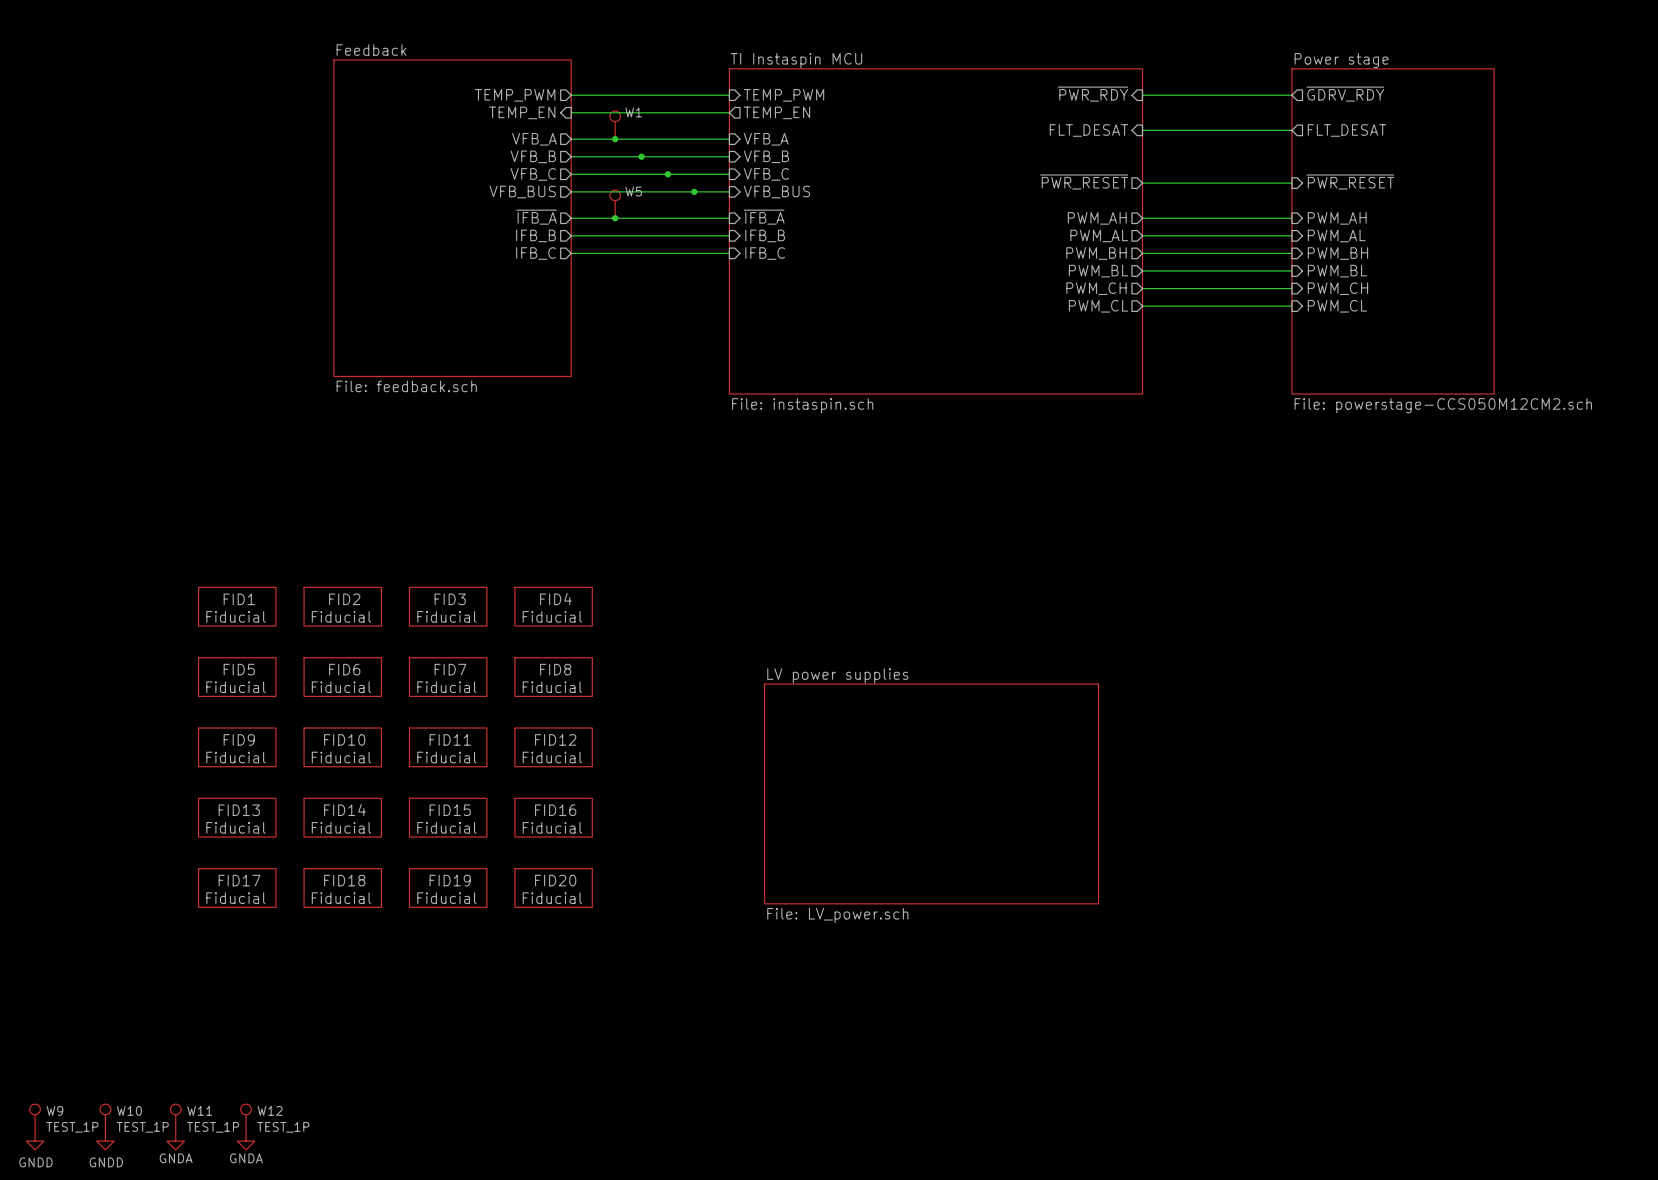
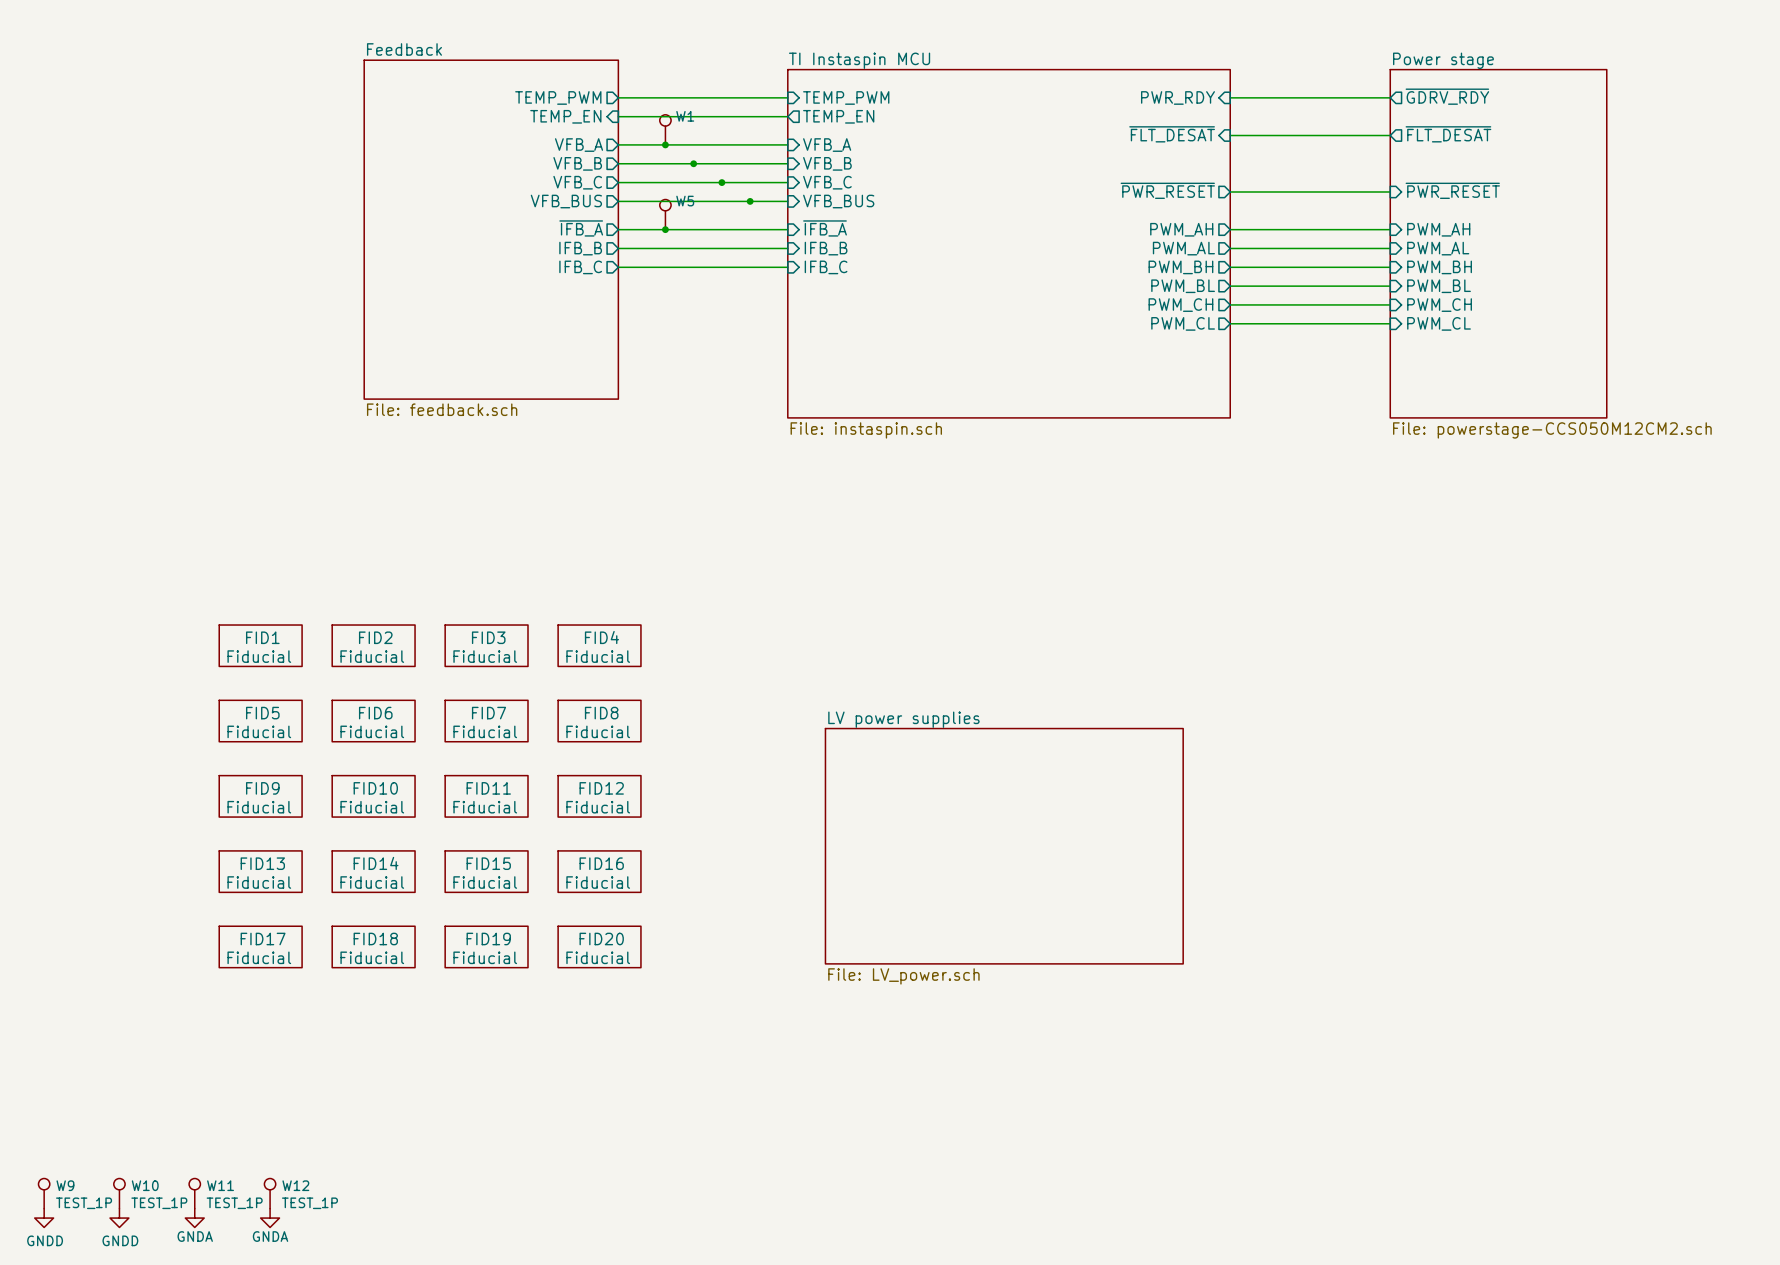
sheet pin: ~{PWR_RDY} (1093, 94) -> PWR_RDY (1177, 97)
sheet pin: FLT_DESAT (1088, 130) -> ~{FLT_DESAT} (1172, 134)
sheet pin: FLT_DESAT (1346, 130) -> ~{FLT_DESAT} (1448, 134)

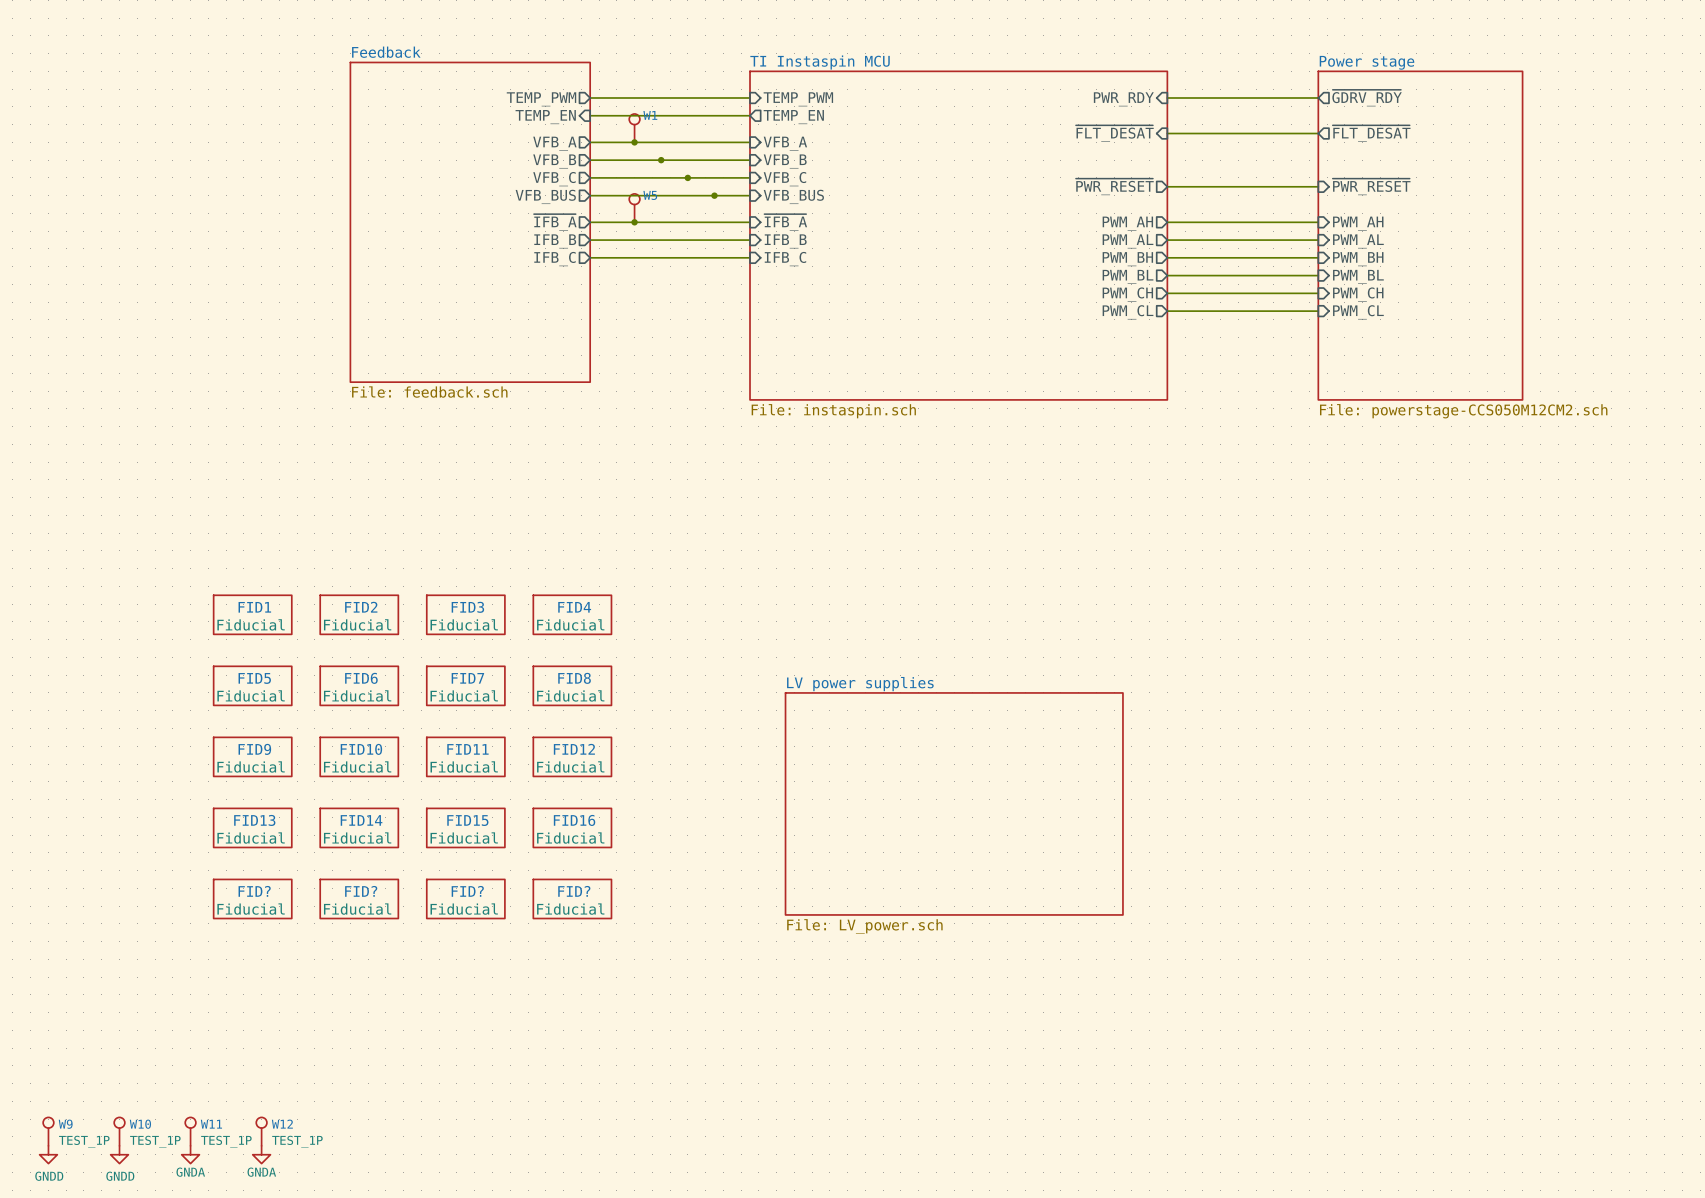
FID17 name: FID17 (263, 939) -> FID? (254, 891)
FID18 name: FID18 (375, 939) -> FID? (361, 891)
FID19 name: FID19 (488, 939) -> FID? (467, 891)
FID20 name: FID20 (601, 939) -> FID? (574, 891)

